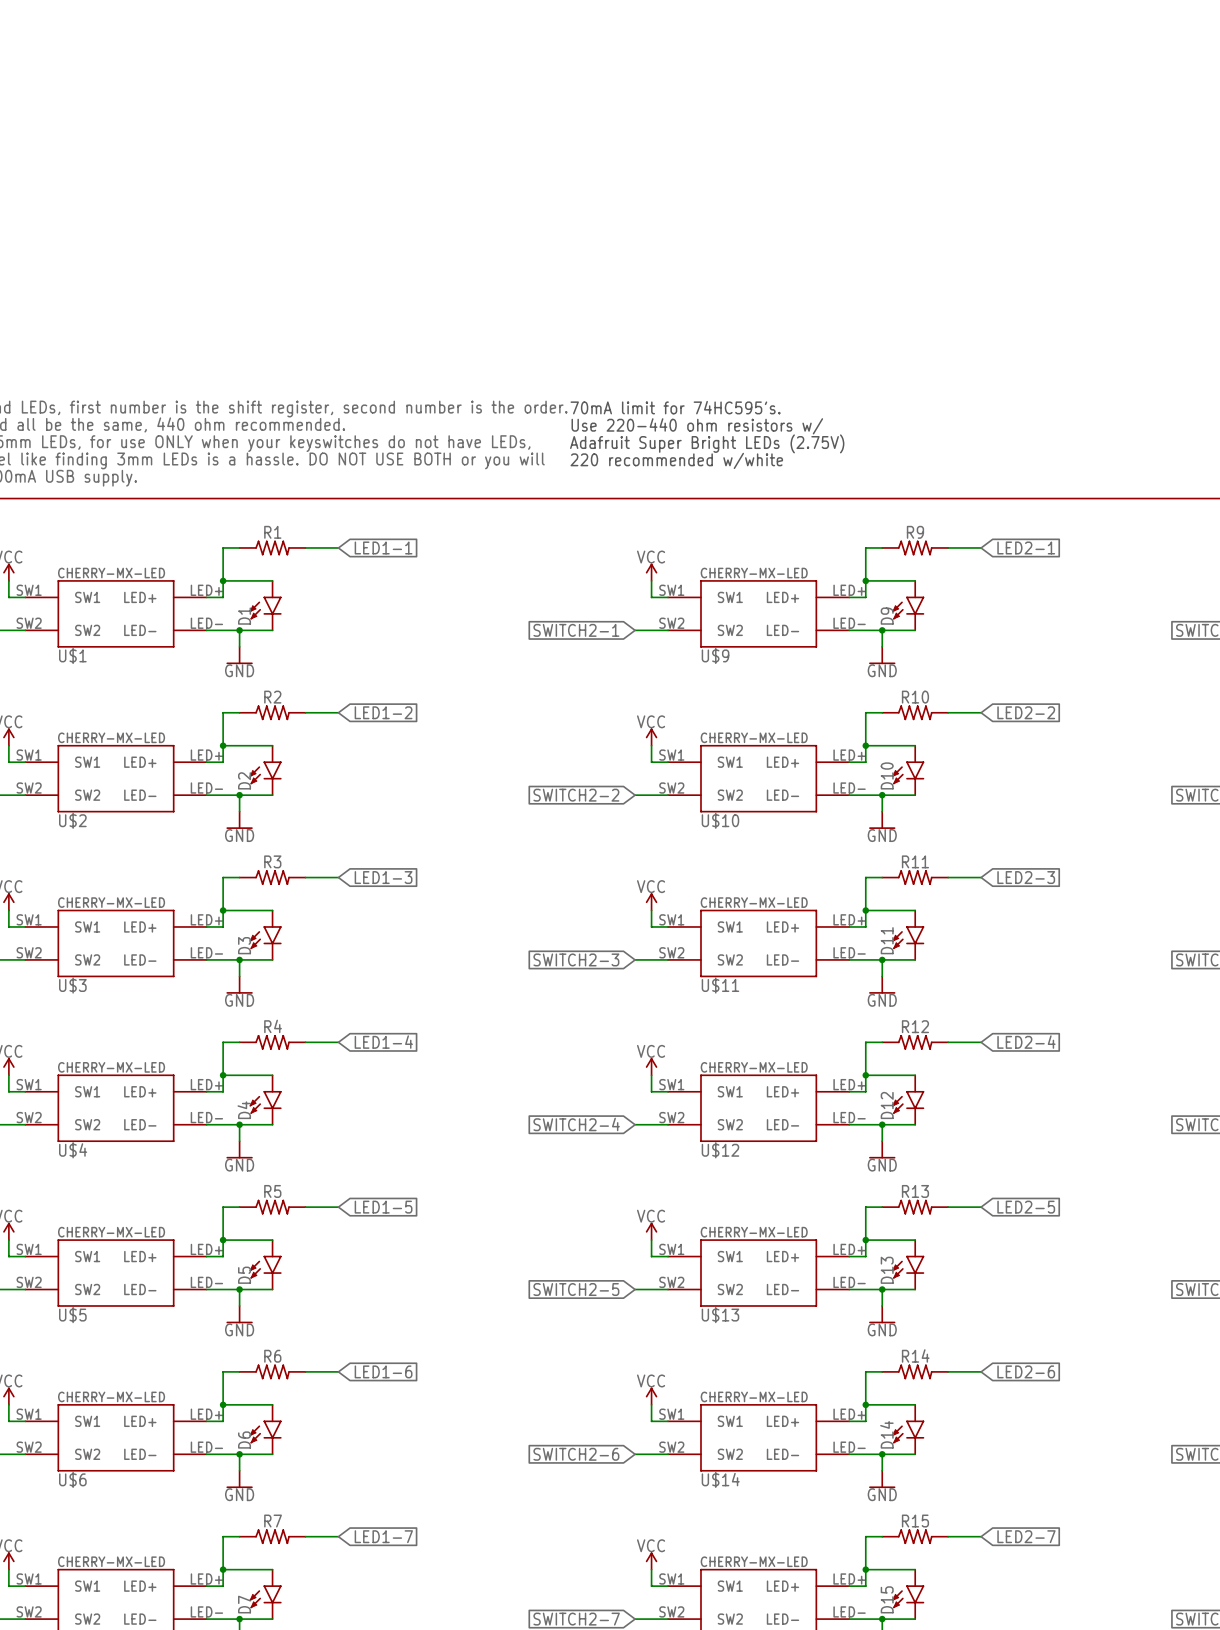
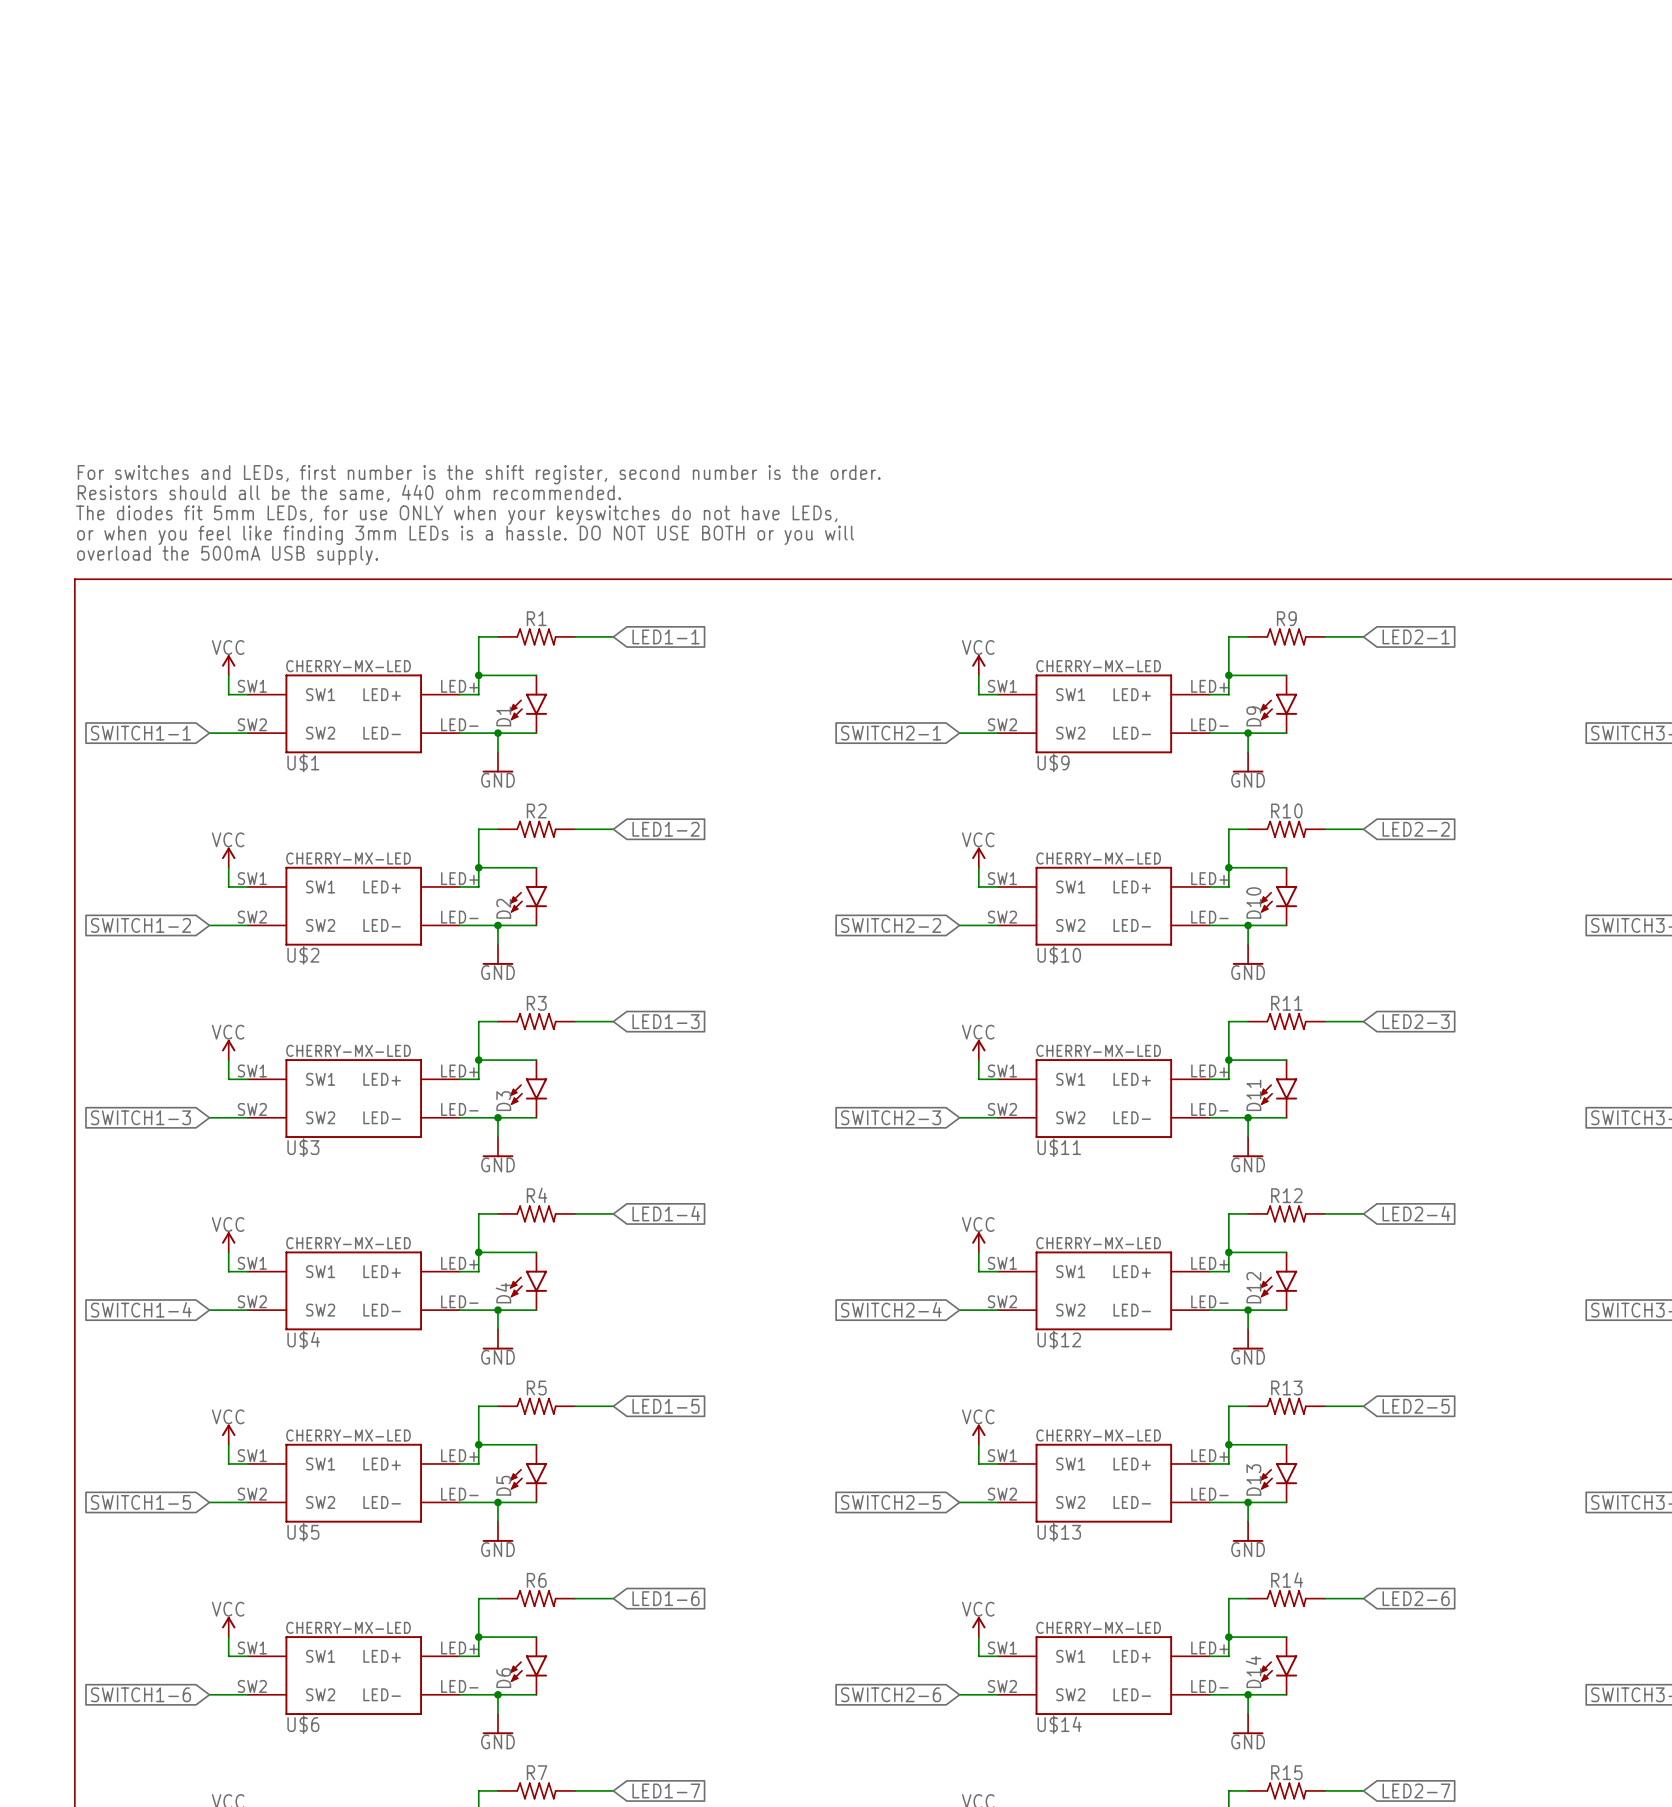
text: 70mA limit for 74HC595's. (675, 407) -> none
text: Use 220-440 ohm resistors w/ (697, 426) -> none
text: Adafruit Super Bright LEDs (2.75V) (707, 443) -> none
text: 220 recommended w/white (676, 460) -> none

